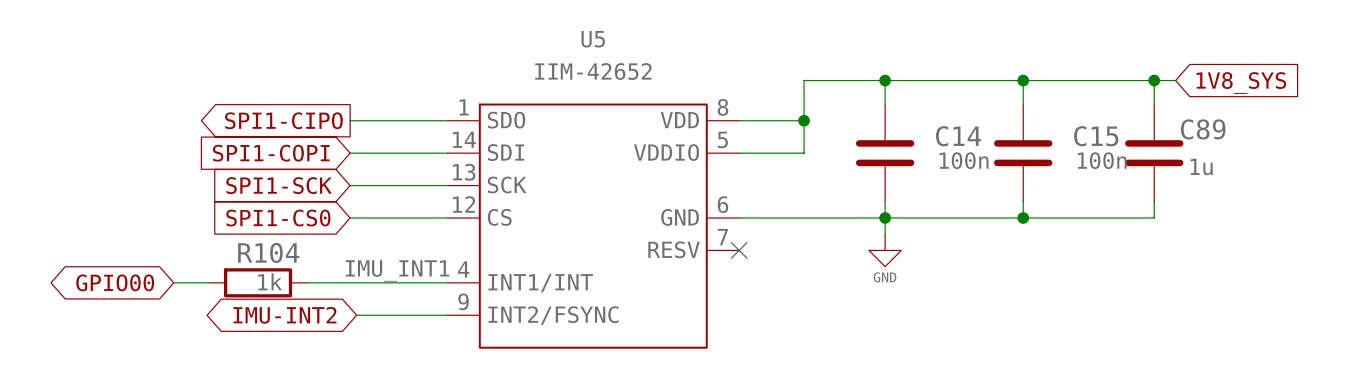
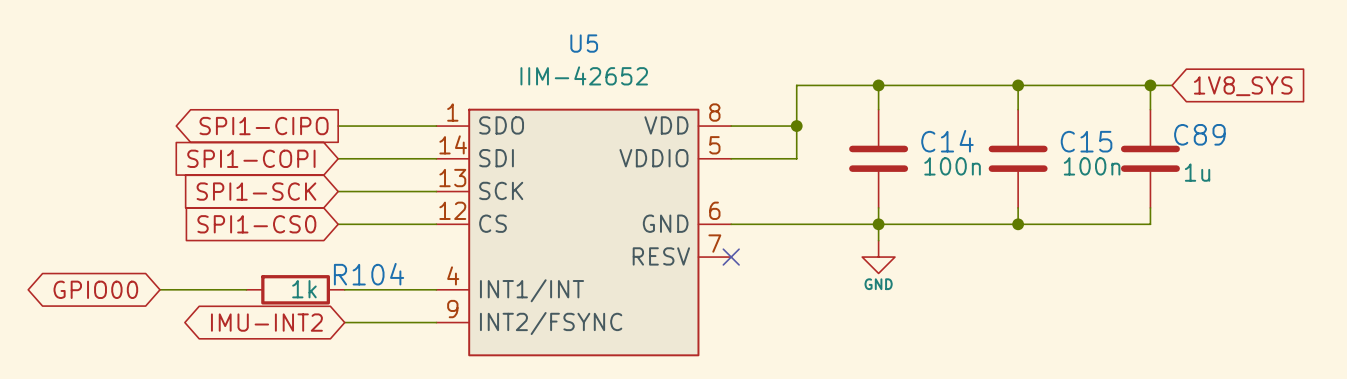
R104 name position: R104 (268, 252) -> R104 (369, 274)
label: IMU_INT1 (397, 271) -> none
R104 position: (258, 282) -> (295, 289)
wire: (306, 282) (356, 282) -> (196, 289) (246, 289)

